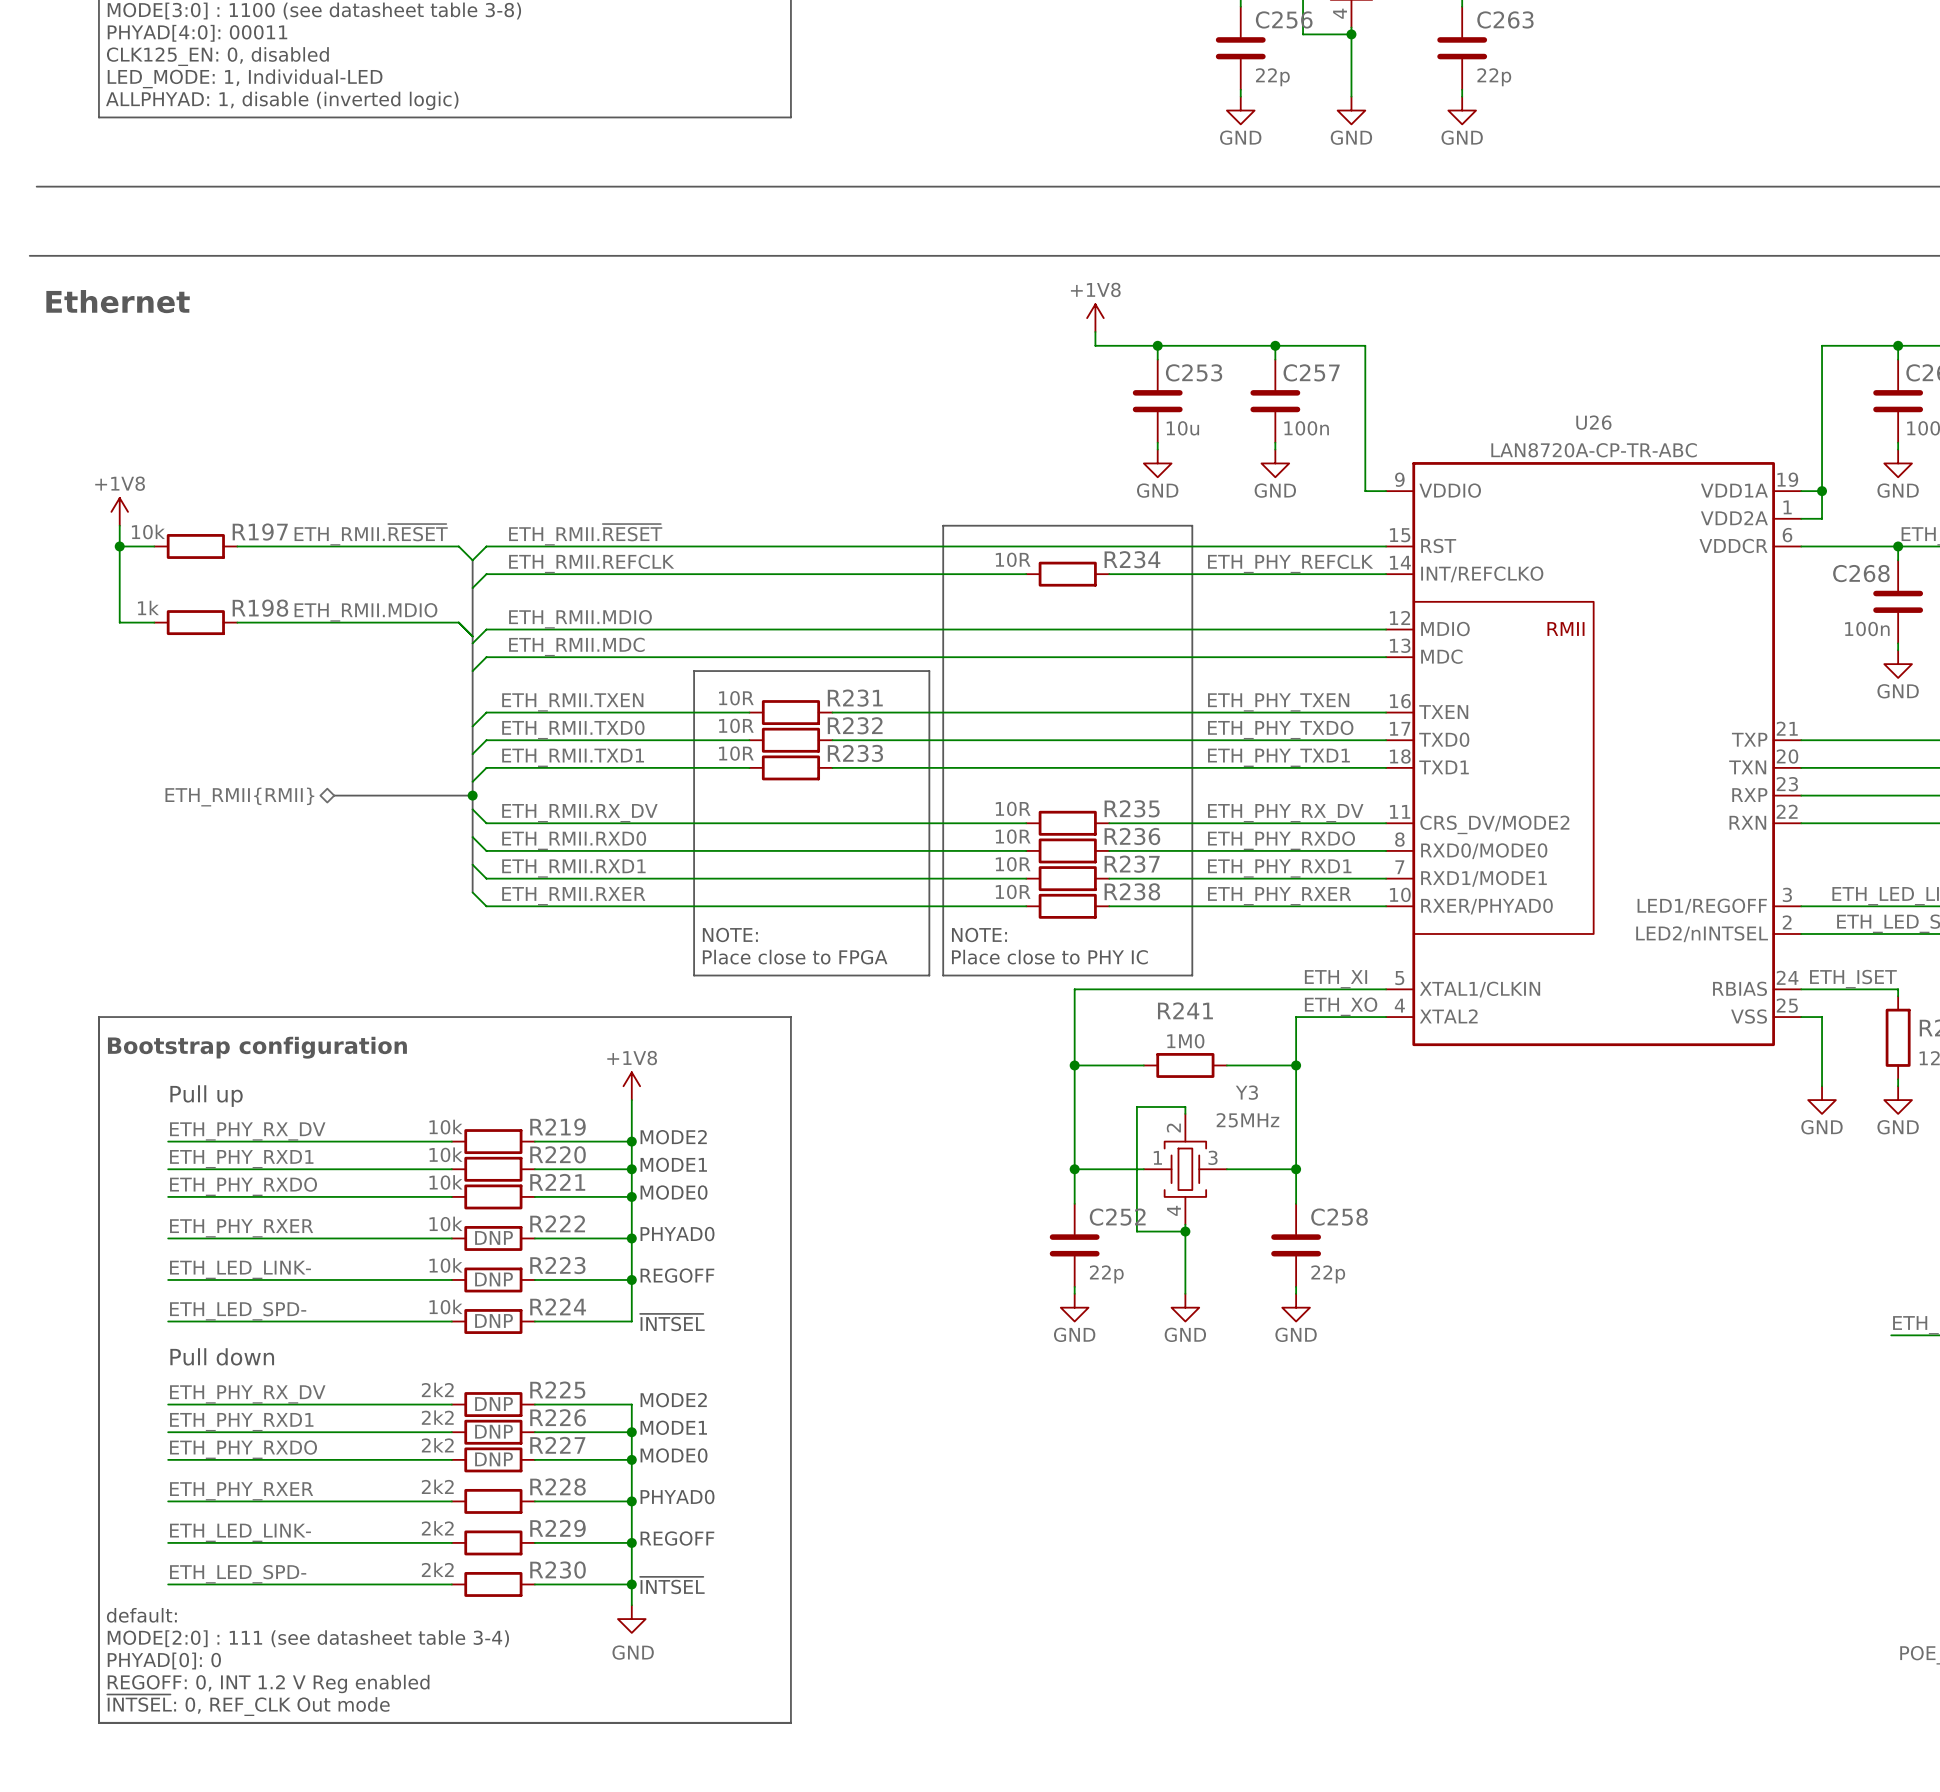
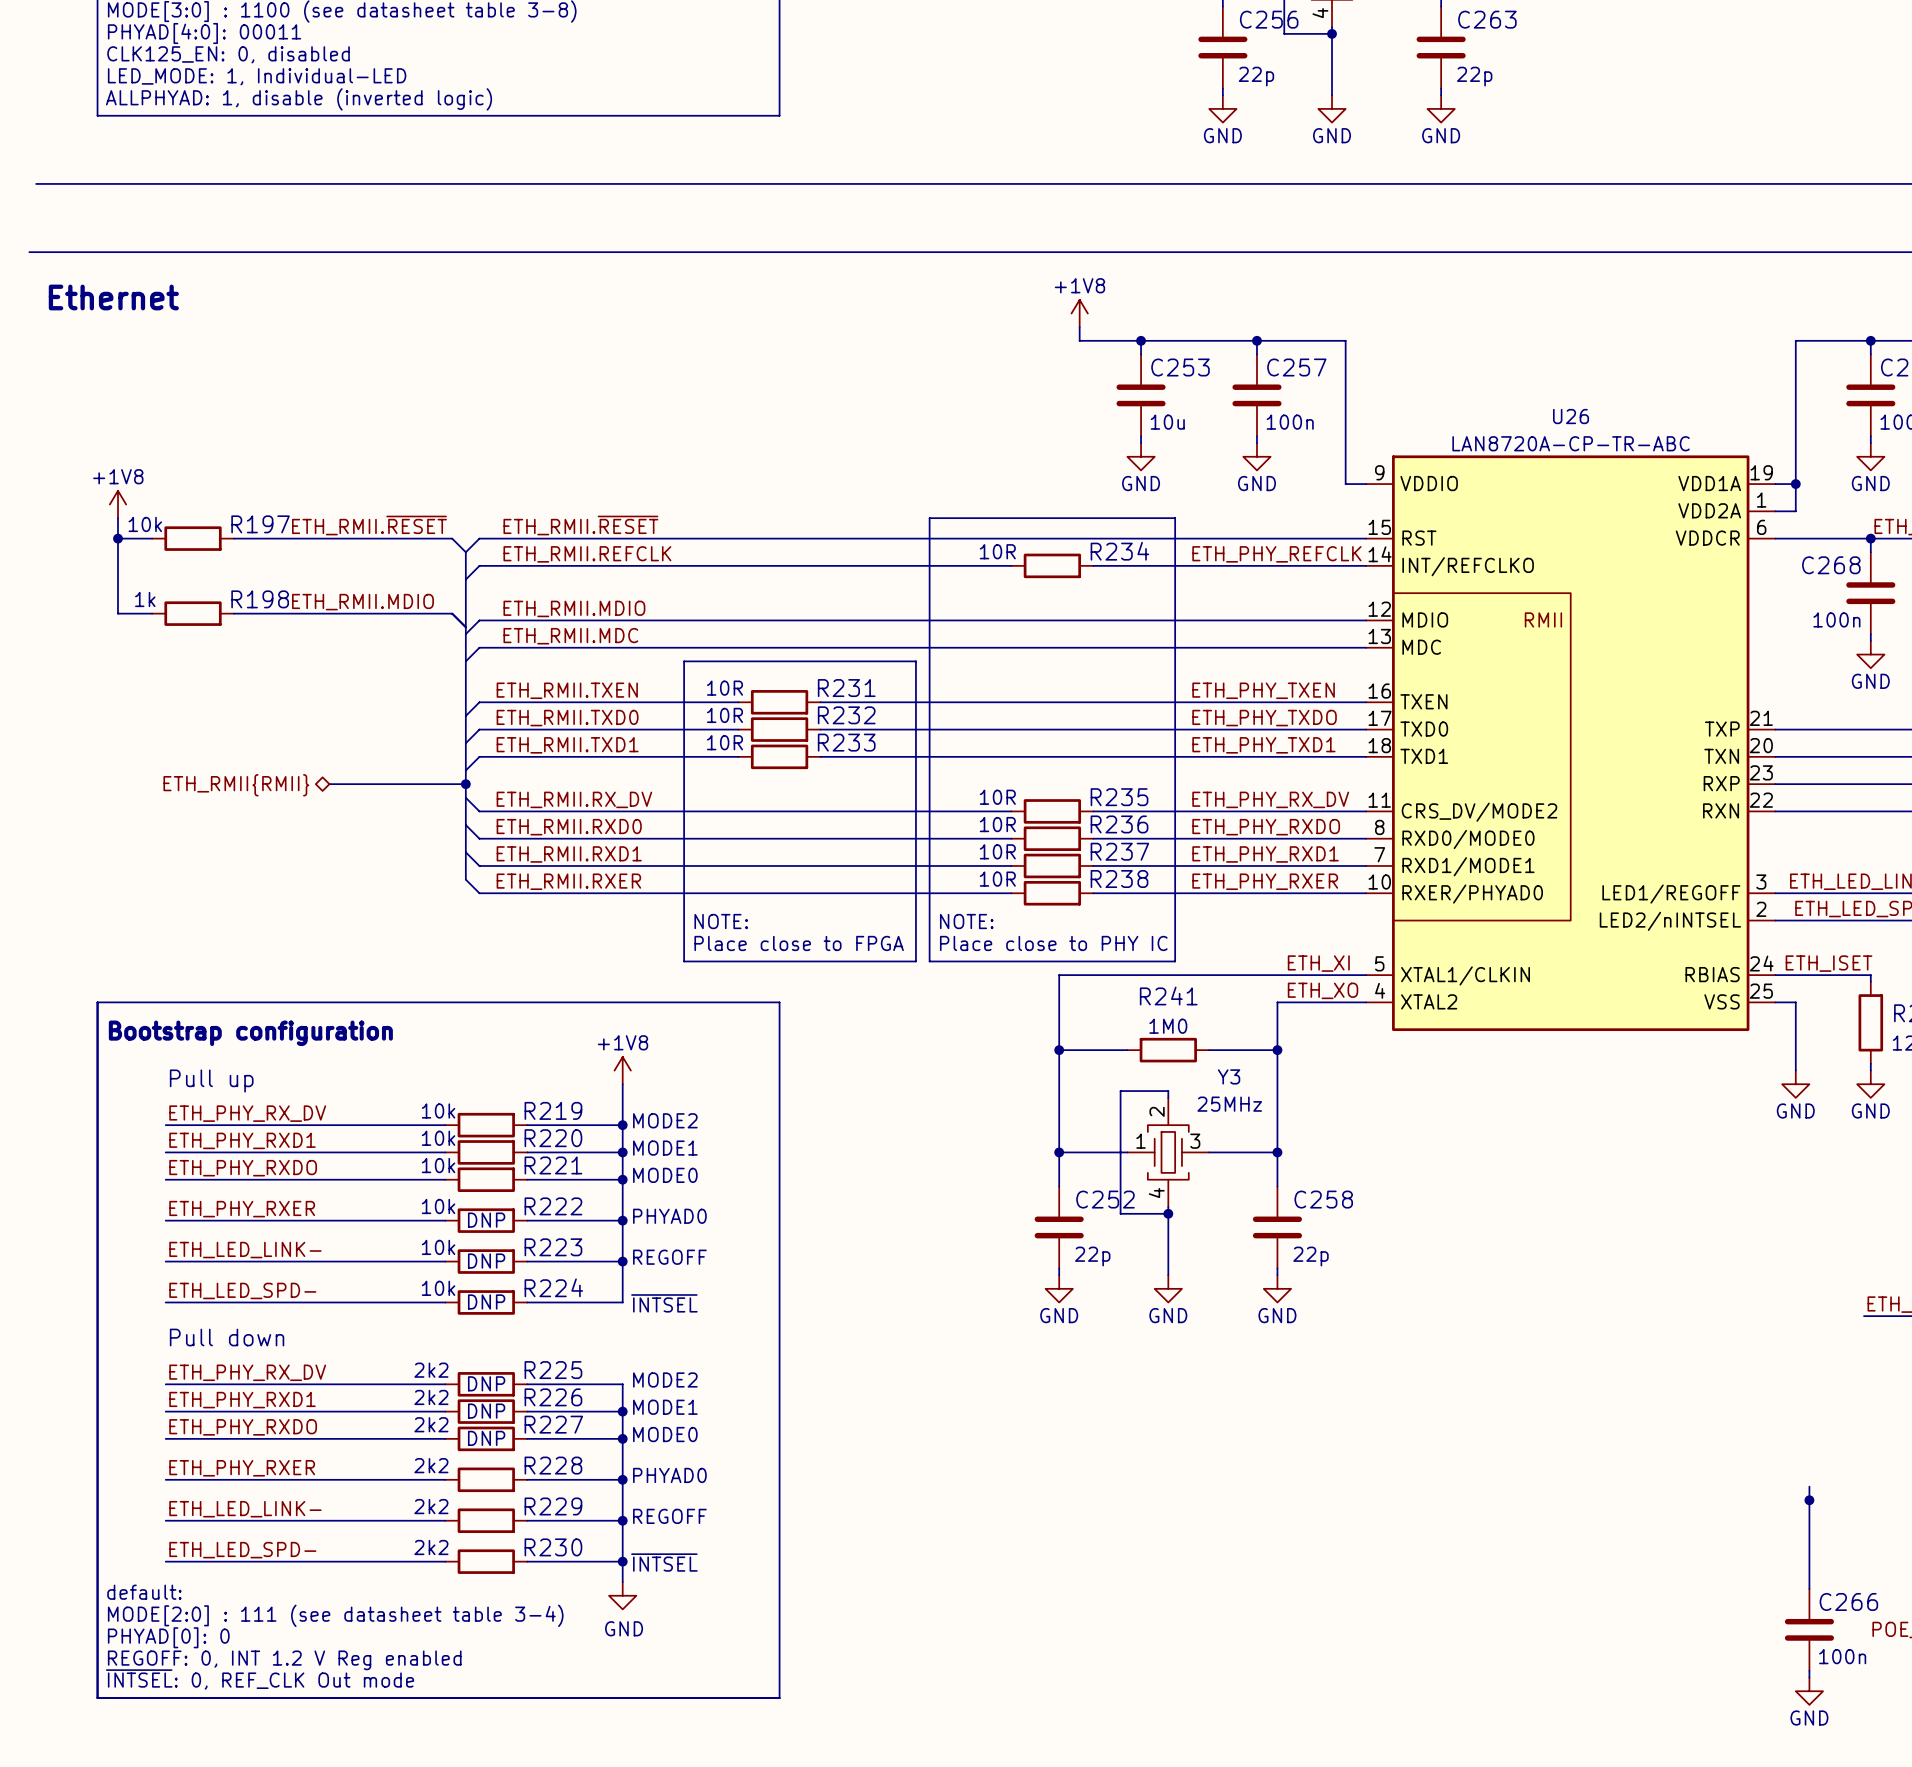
wire: none -> (1809, 1486) (1809, 1588)
junction: none -> (1809, 1500)
C266: none -> (1809, 1629)
wire: none -> (1809, 1670) (1809, 1677)
power symbol: none -> GND (1809, 1691)

